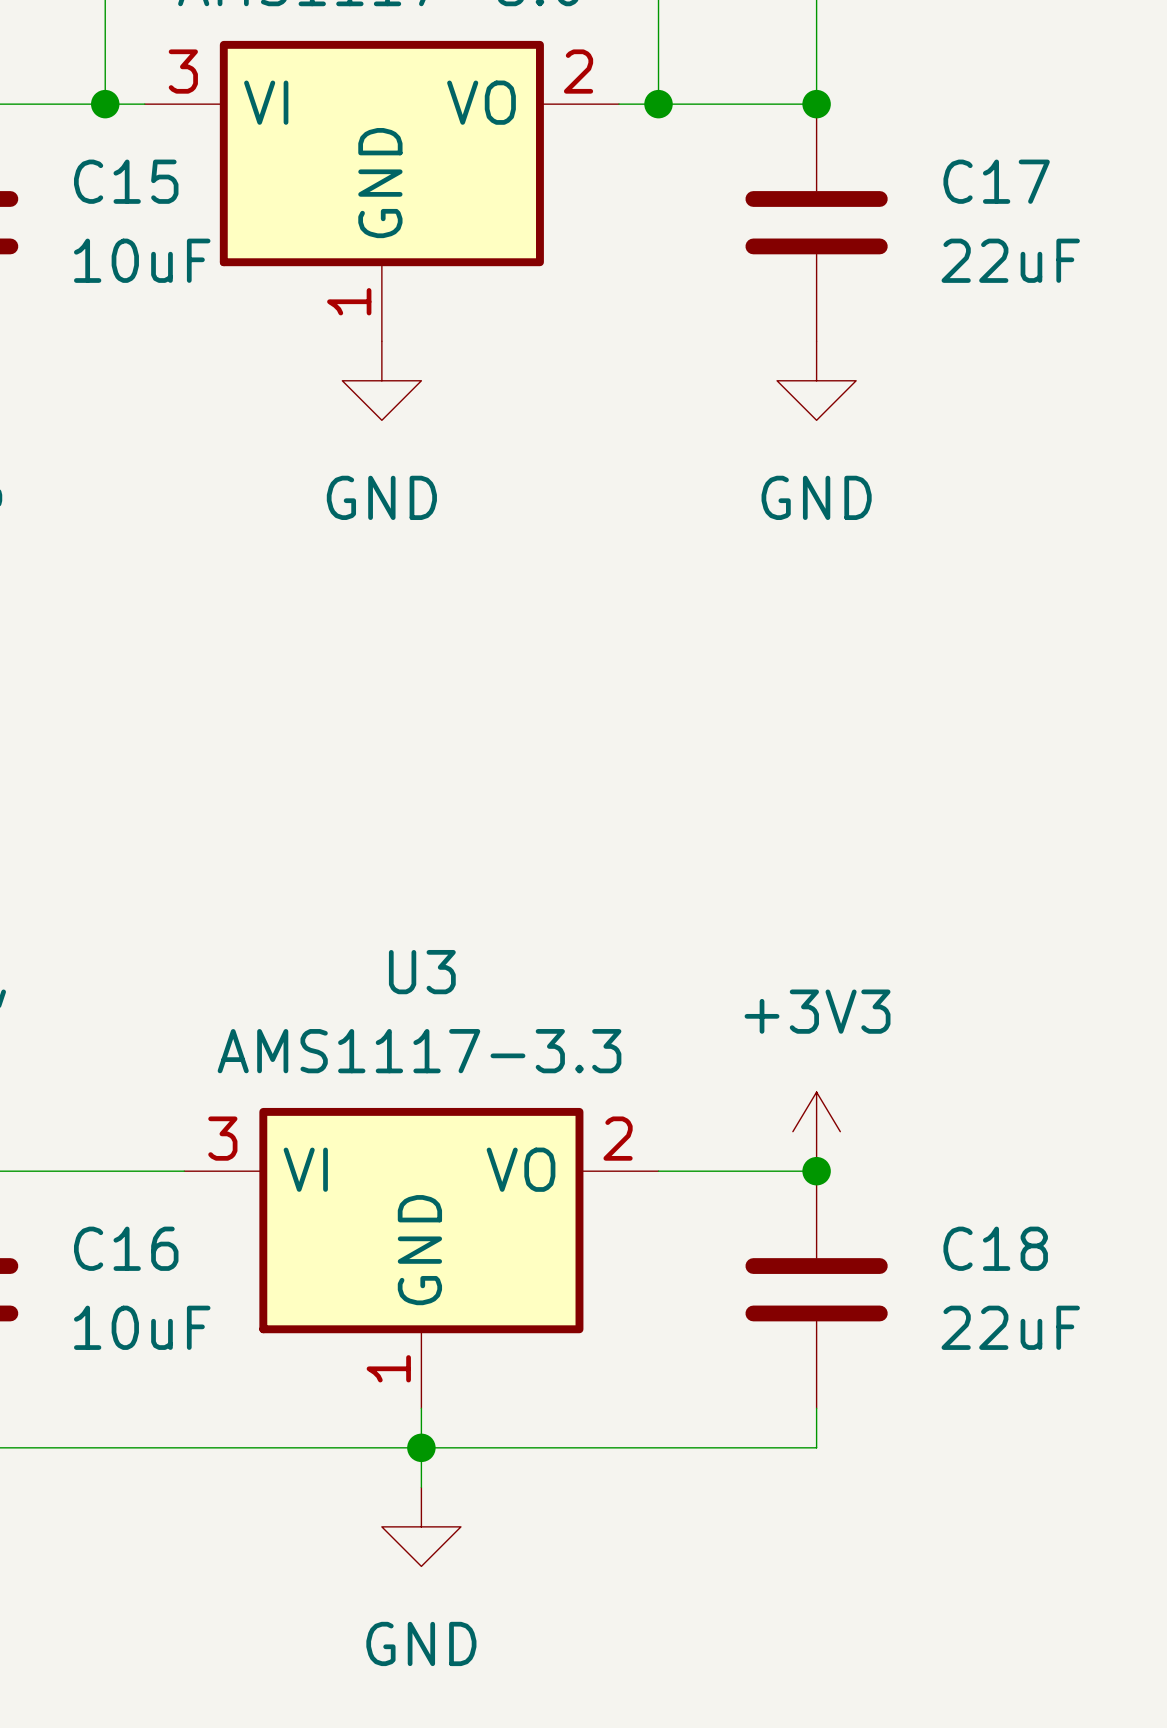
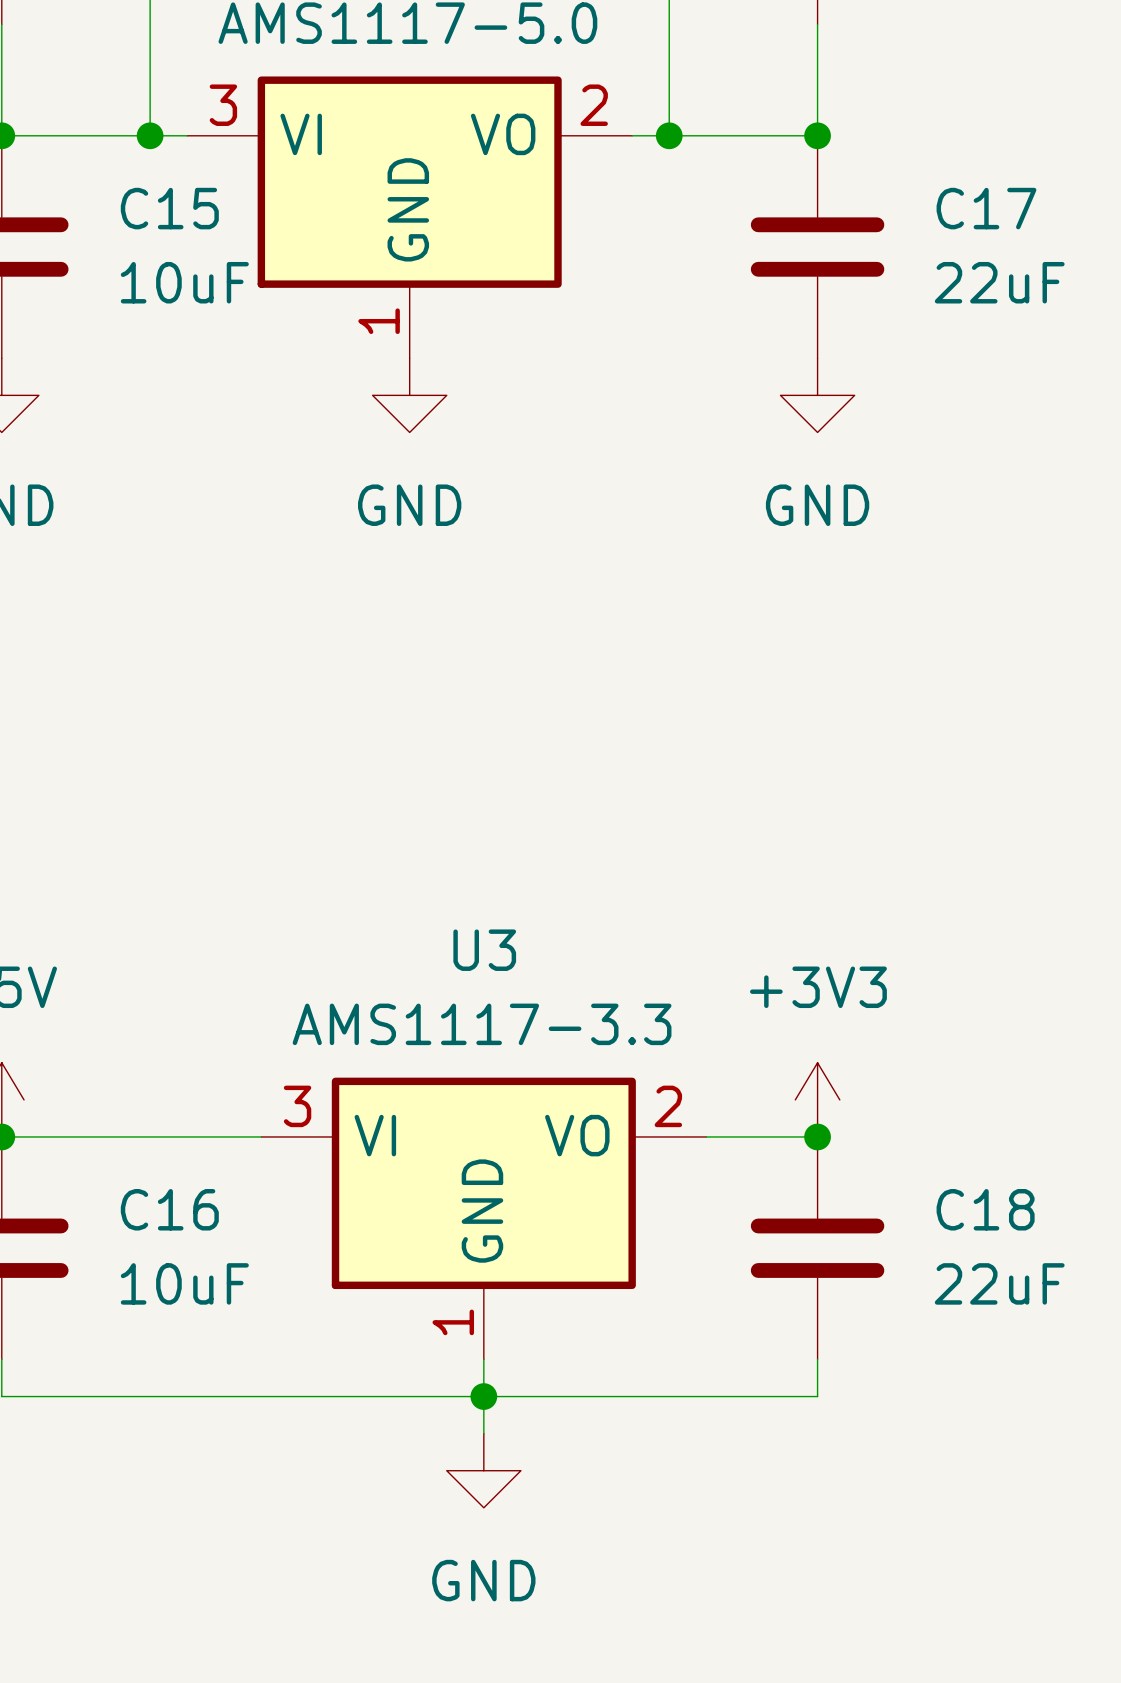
U3 position: (421, 1258) -> (483, 1218)
wire: (421, 1408) (421, 1487) -> (483, 1359) (483, 1433)
junction position: (421, 1447) -> (483, 1396)
power symbol position: GND (421, 1526) -> GND (483, 1470)

